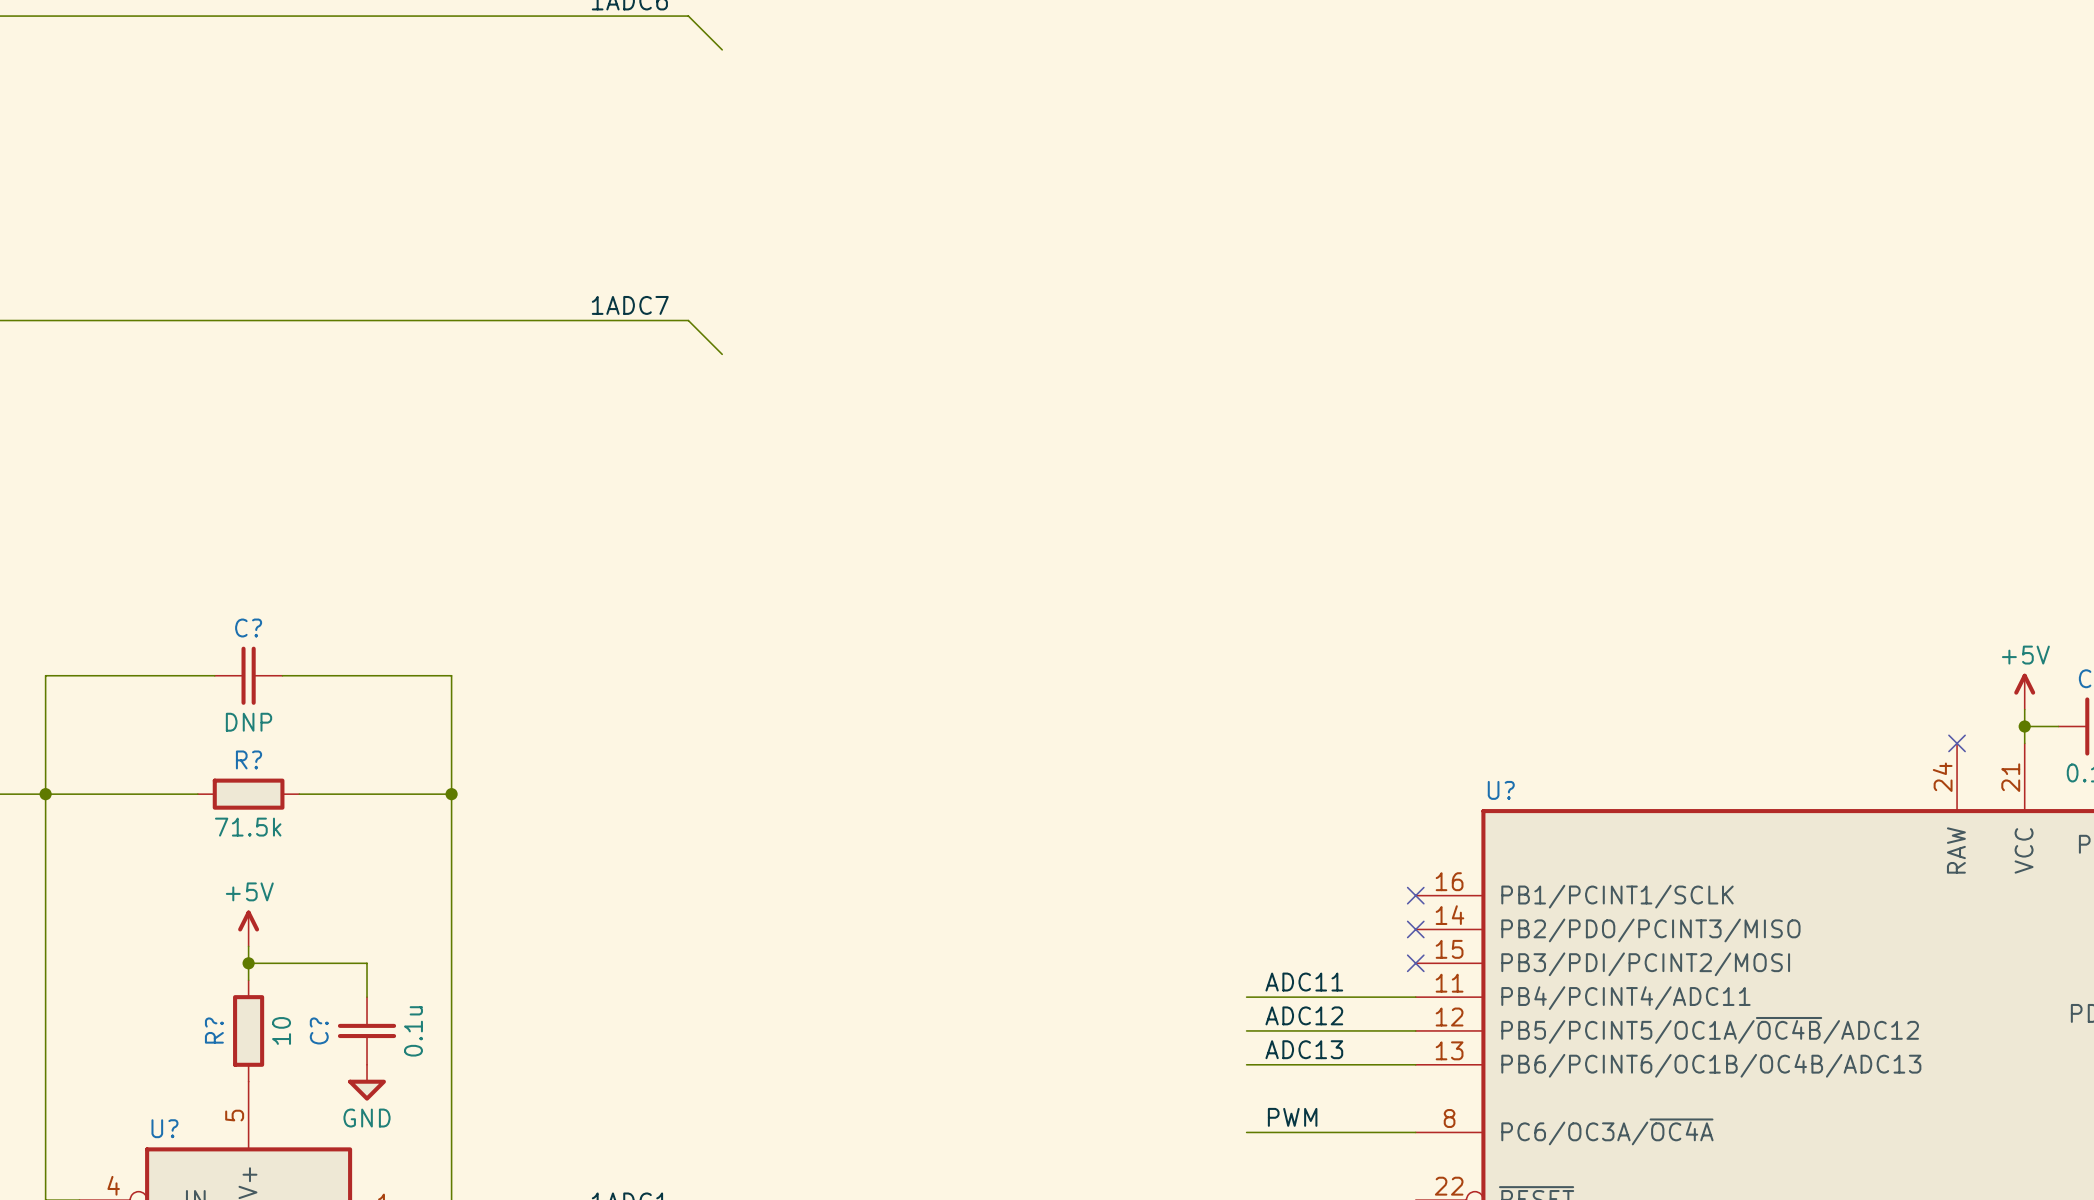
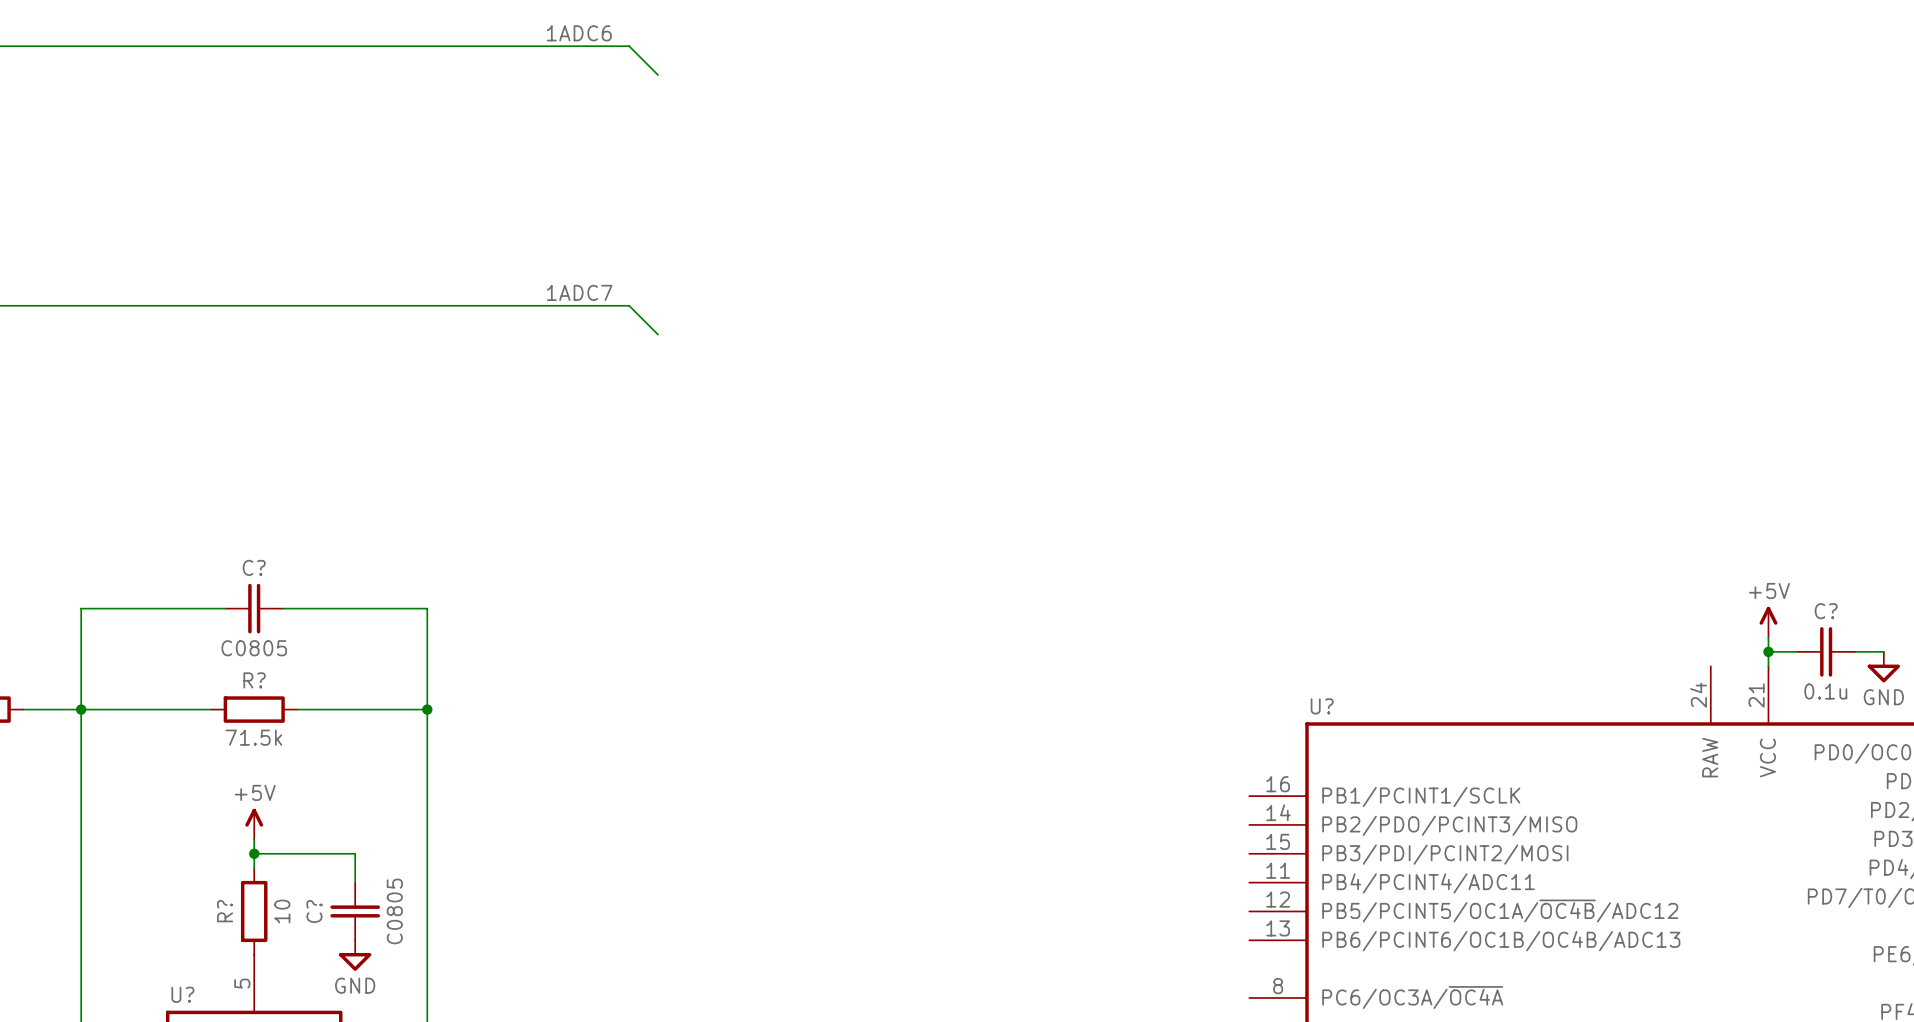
C? value: DNP (249, 722) -> C0805 (254, 648)
no-connect mark: (1957, 743) -> none
no-connect mark: (1415, 895) -> none
no-connect mark: (1415, 929) -> none
no-connect mark: (1415, 963) -> none
label: ADC11 (1304, 982) -> none
wire: (1246, 997) (1415, 997) -> none
label: ADC12 (1304, 1015) -> none
wire: (1246, 1030) (1415, 1030) -> none
C? value: 0.1u (413, 1031) -> C0805 (394, 911)
label: ADC13 (1304, 1049) -> none
wire: (1246, 1064) (1415, 1064) -> none
label: PWM (1292, 1117) -> none
wire: (1246, 1132) (1415, 1132) -> none

